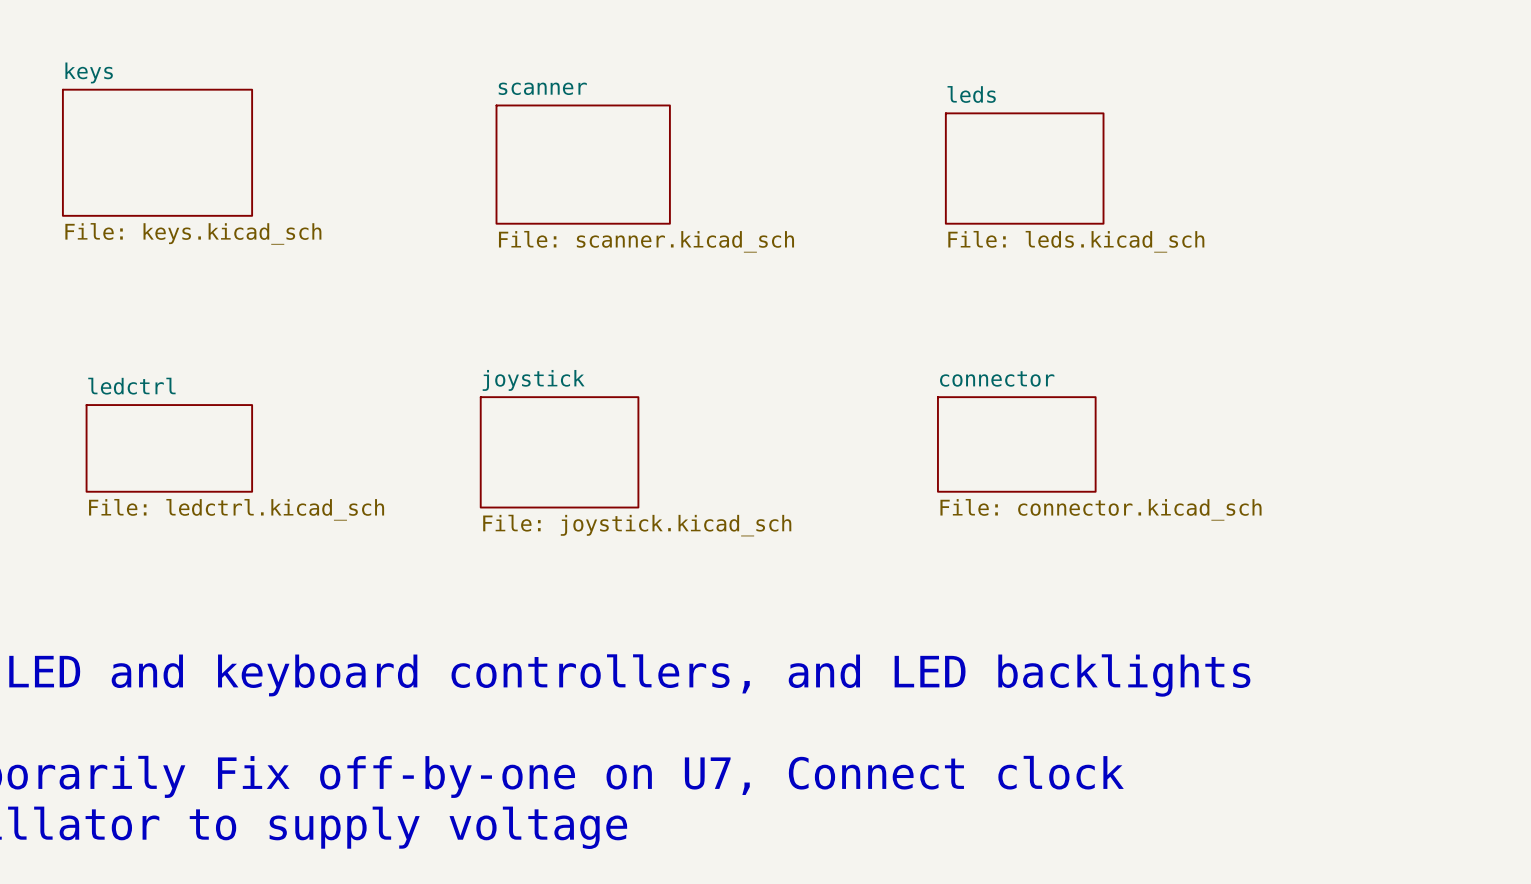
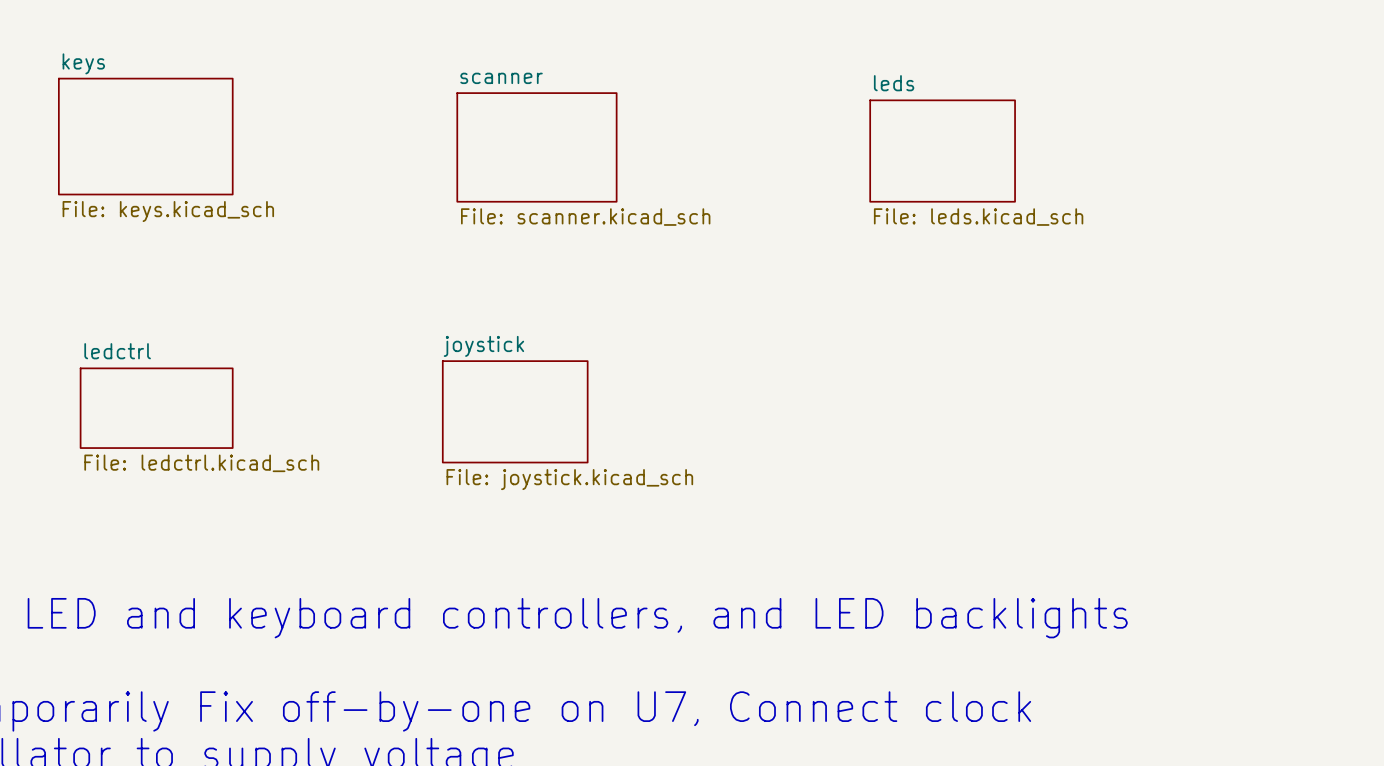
sheet connector: File: connector.kicad_sch (1016, 444) -> none

